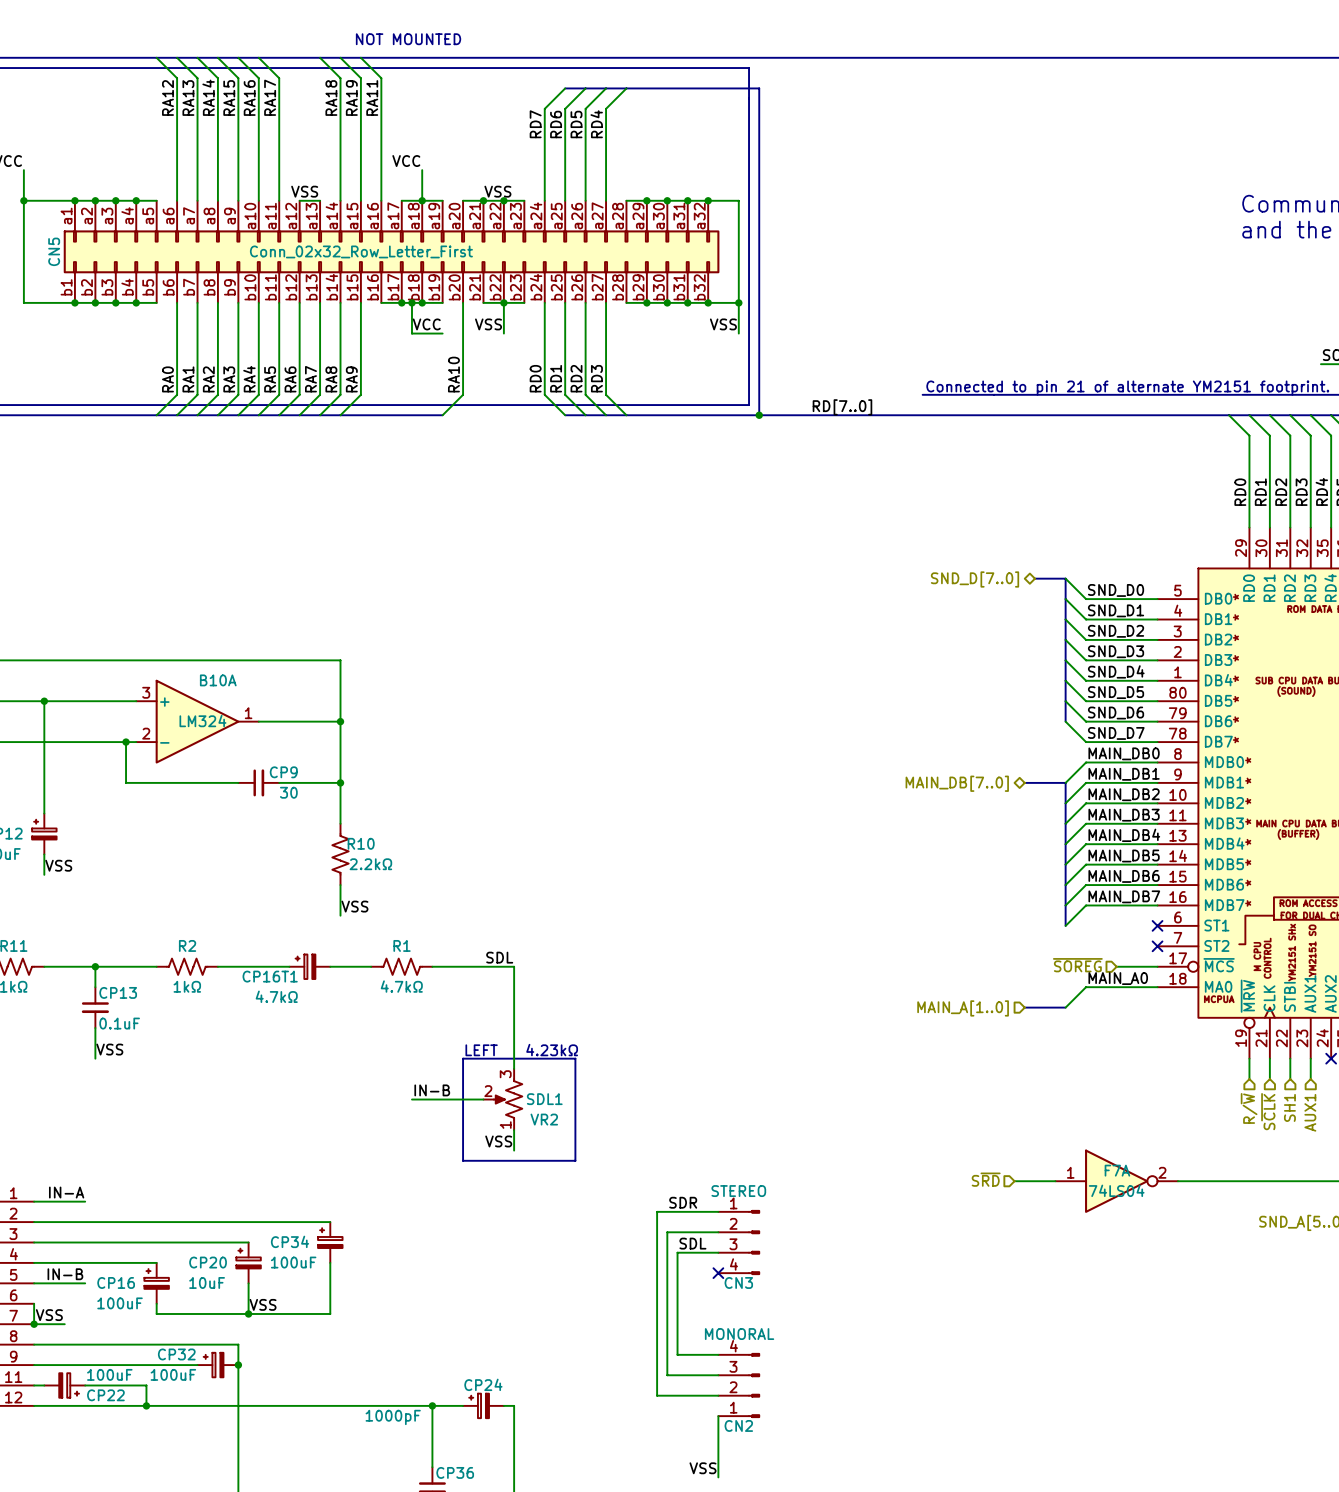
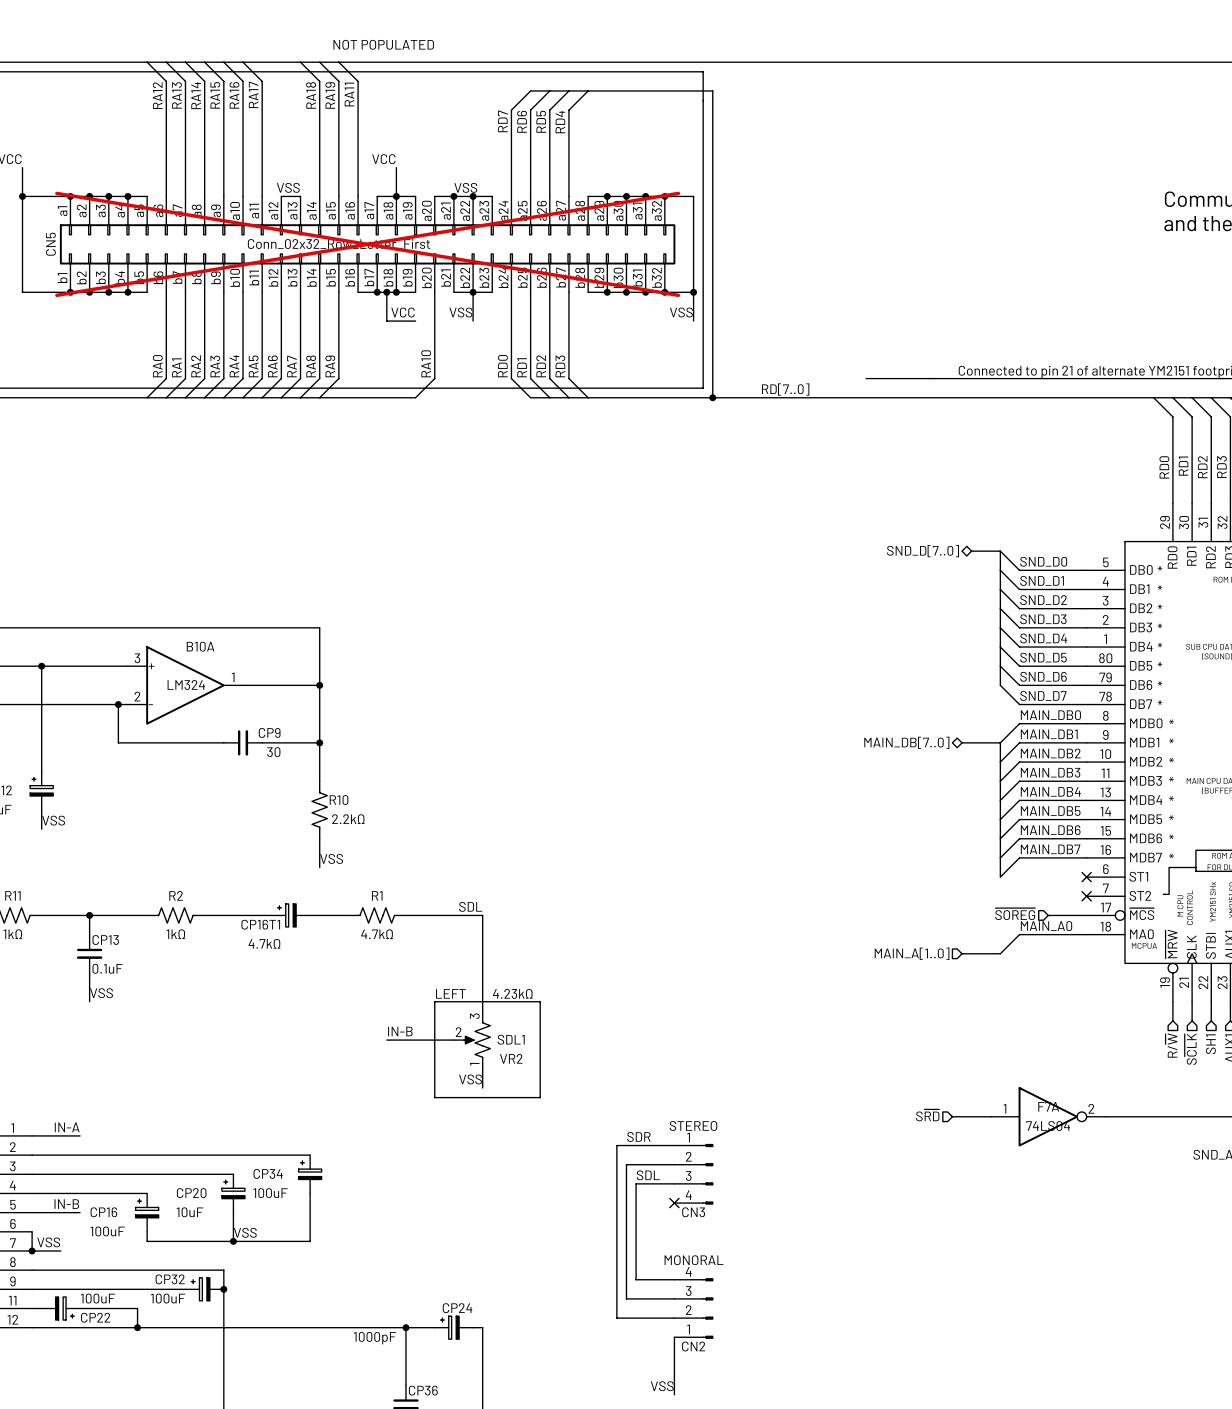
text: NOT MOUNTED (408, 39) -> NOT POPULATED (383, 44)
CN5 do-not-place cross: none -> (367, 244)

